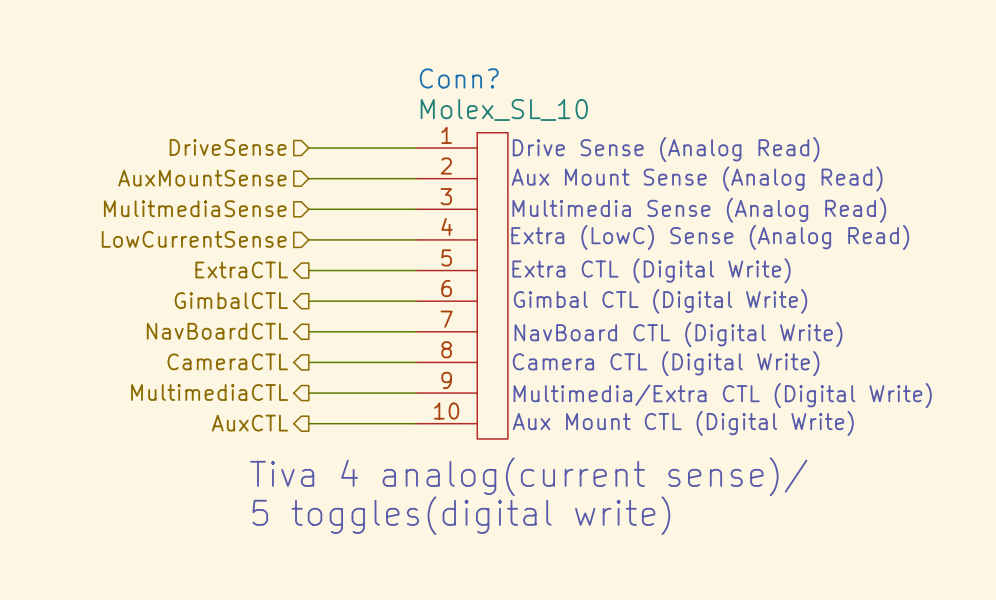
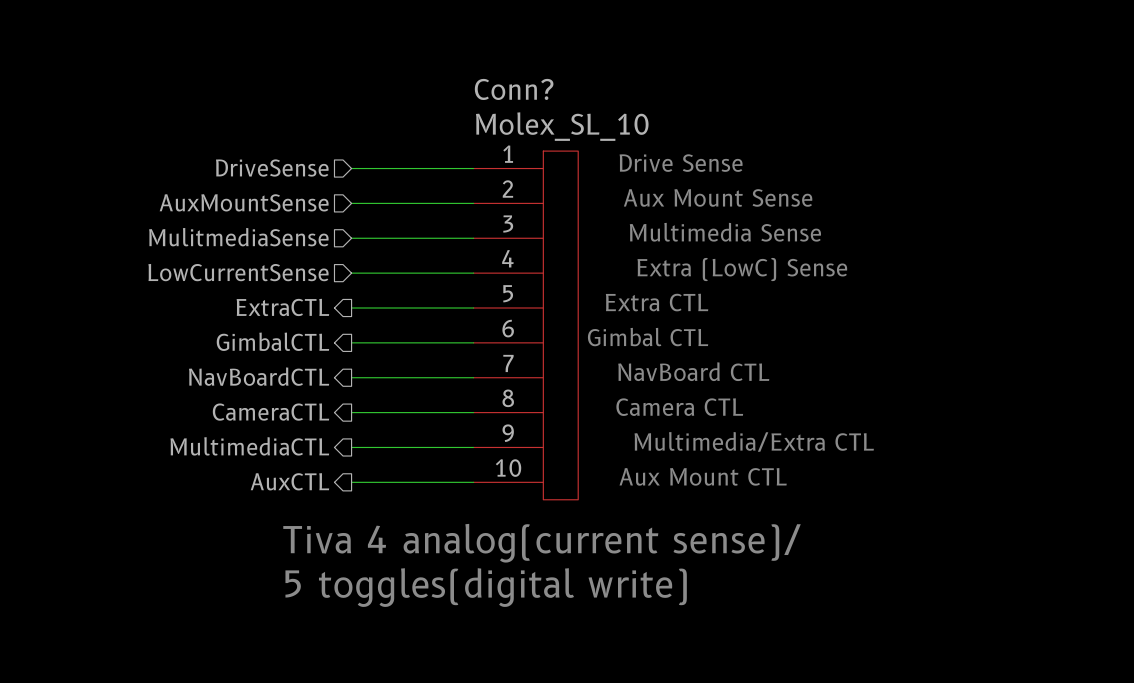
text: Drive Sense (Analog Read) (666, 149) -> Drive Sense (681, 163)
text: Aux Mount Sense (Analog Read) (697, 178) -> Aux Mount Sense (718, 197)
text: Multimedia Sense (Analog Read) (699, 210) -> Multimedia Sense (725, 232)
text: Extra (LowC) Sense (Analog Read) (710, 237) -> Extra (LowC) Sense (742, 269)
text: none -> Extra CTL (657, 302)
text: Extra CTL (Digital Write) (651, 270) -> none
text: Gimbal CTL (Digital Write) (660, 301) -> Gimbal CTL (648, 337)
text: none -> NavBoard CTL (693, 371)
text: NavBoard CTL (Digital Write) (678, 334) -> none
text: none -> Camera CTL (679, 407)
text: Camera CTL (Digital Write) (666, 363) -> none
text: Multimedia/Extra CTL (Digital Write) (722, 395) -> Multimedia/Extra CTL (754, 441)
text: Aux Mount CTL (Digital Write) (683, 423) -> Aux Mount CTL (703, 476)

